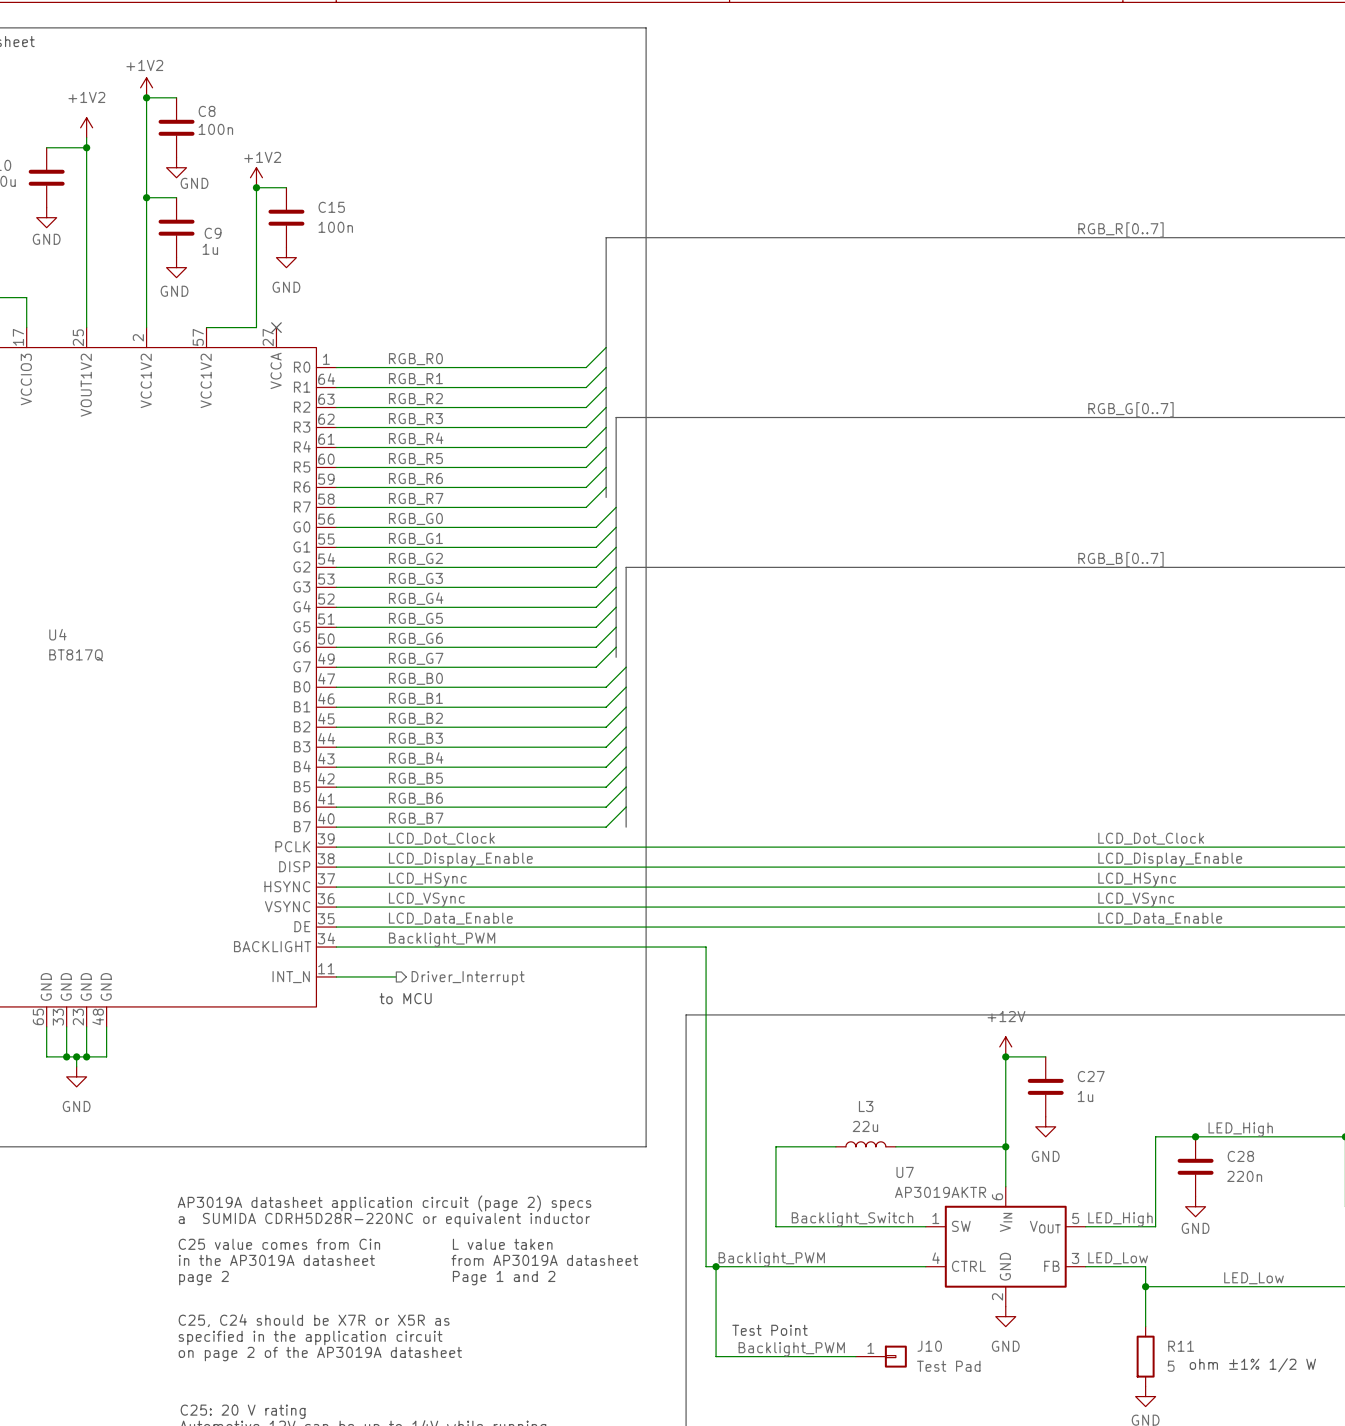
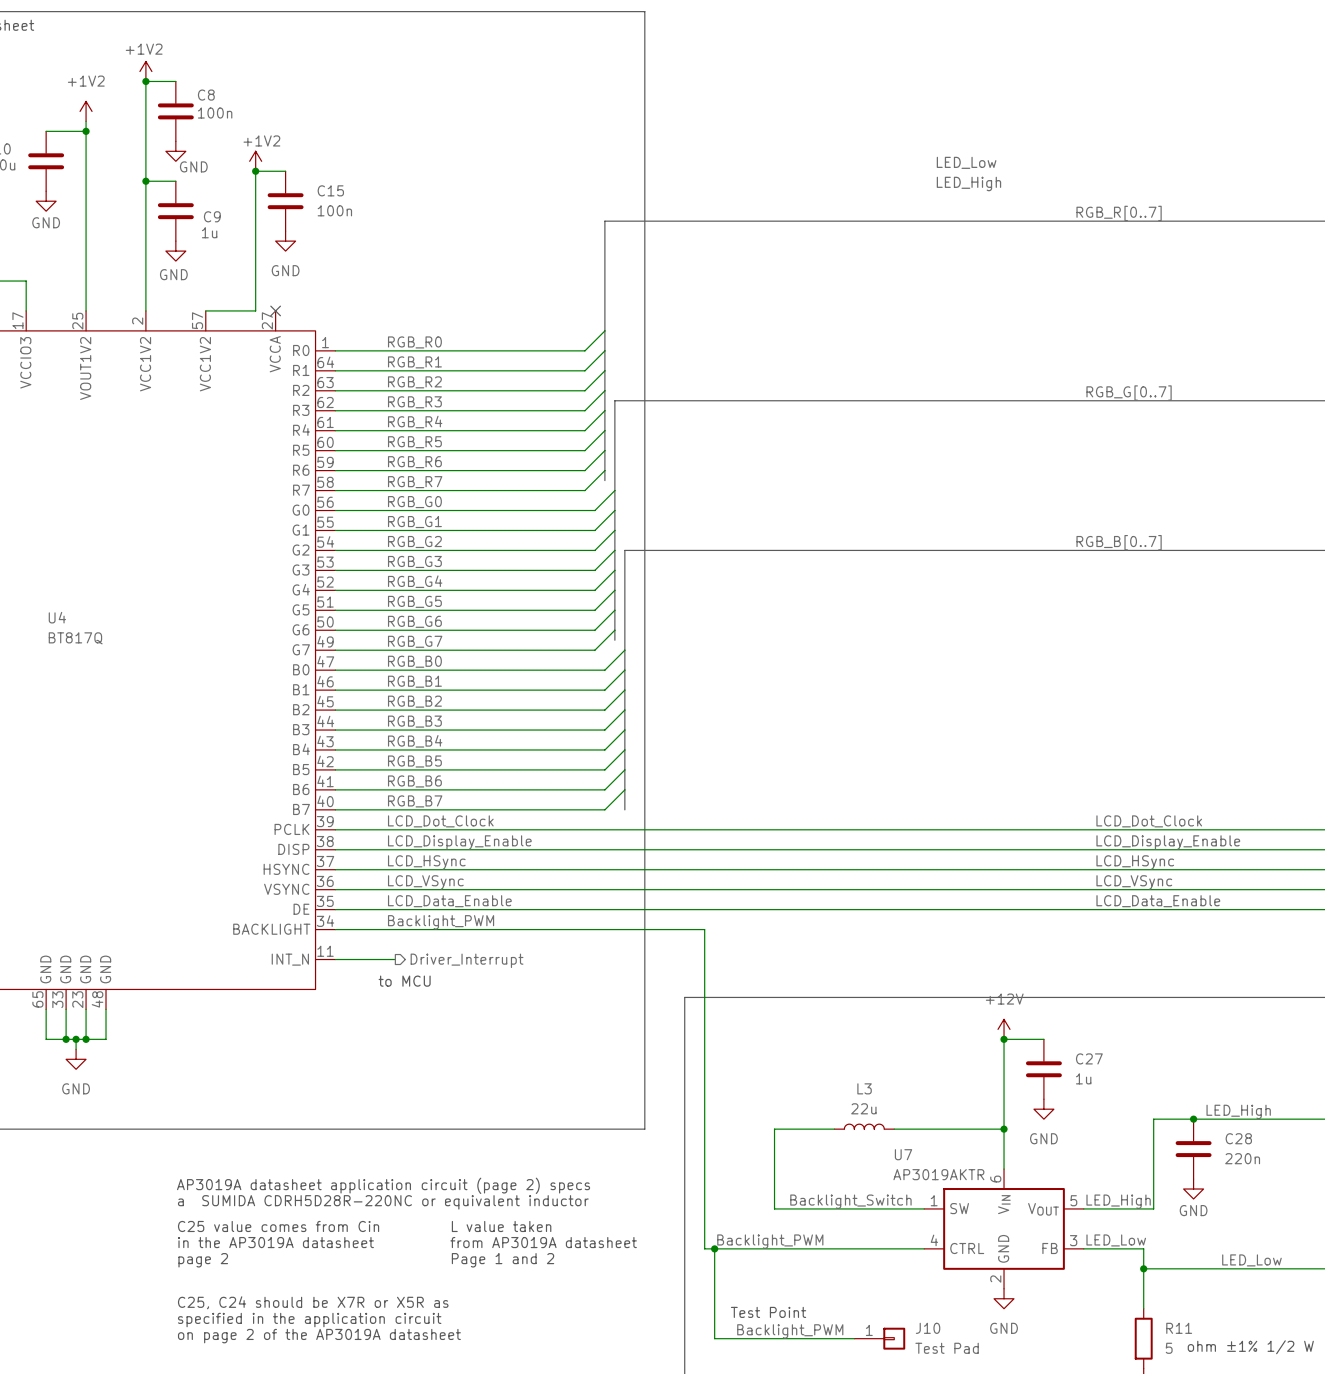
label: none -> LED_Low (966, 162)
label: none -> LED_High (968, 183)

